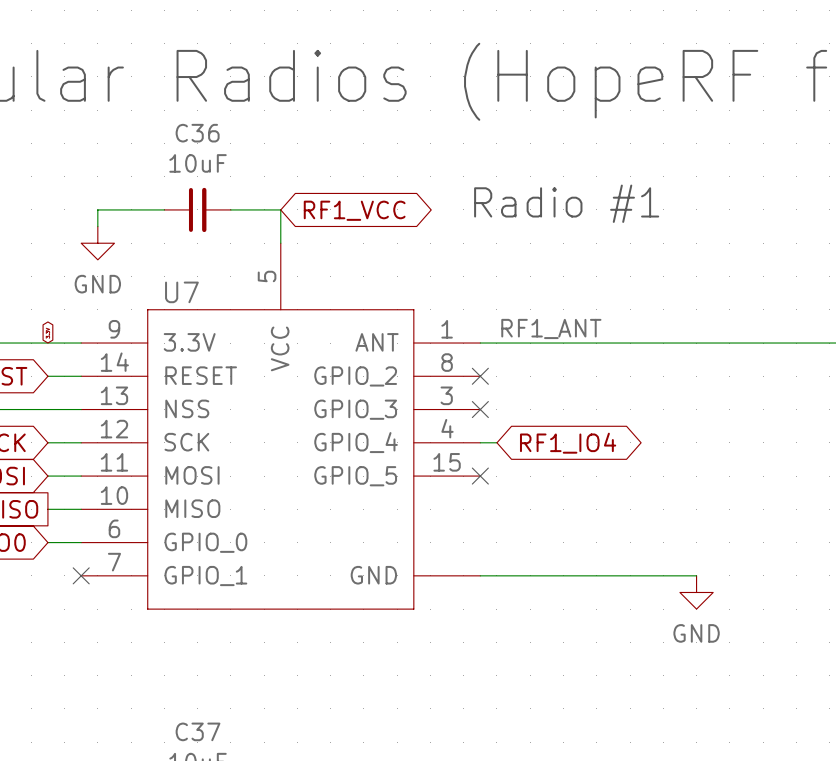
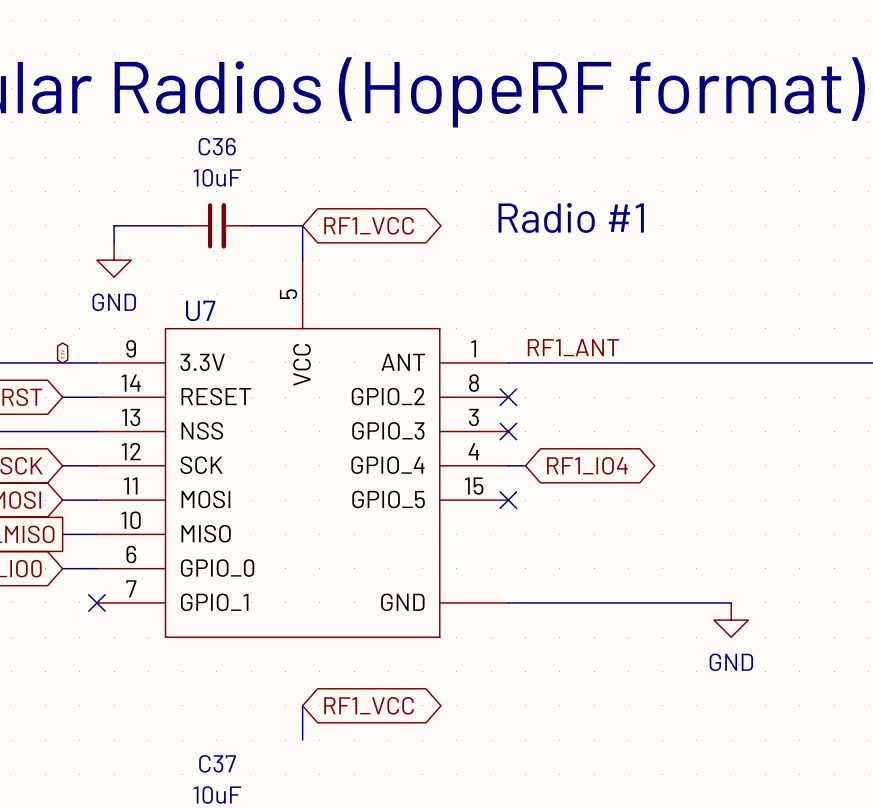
wire: none -> (302, 705) (302, 740)
global label: none -> RF1_VCC (369, 705)

